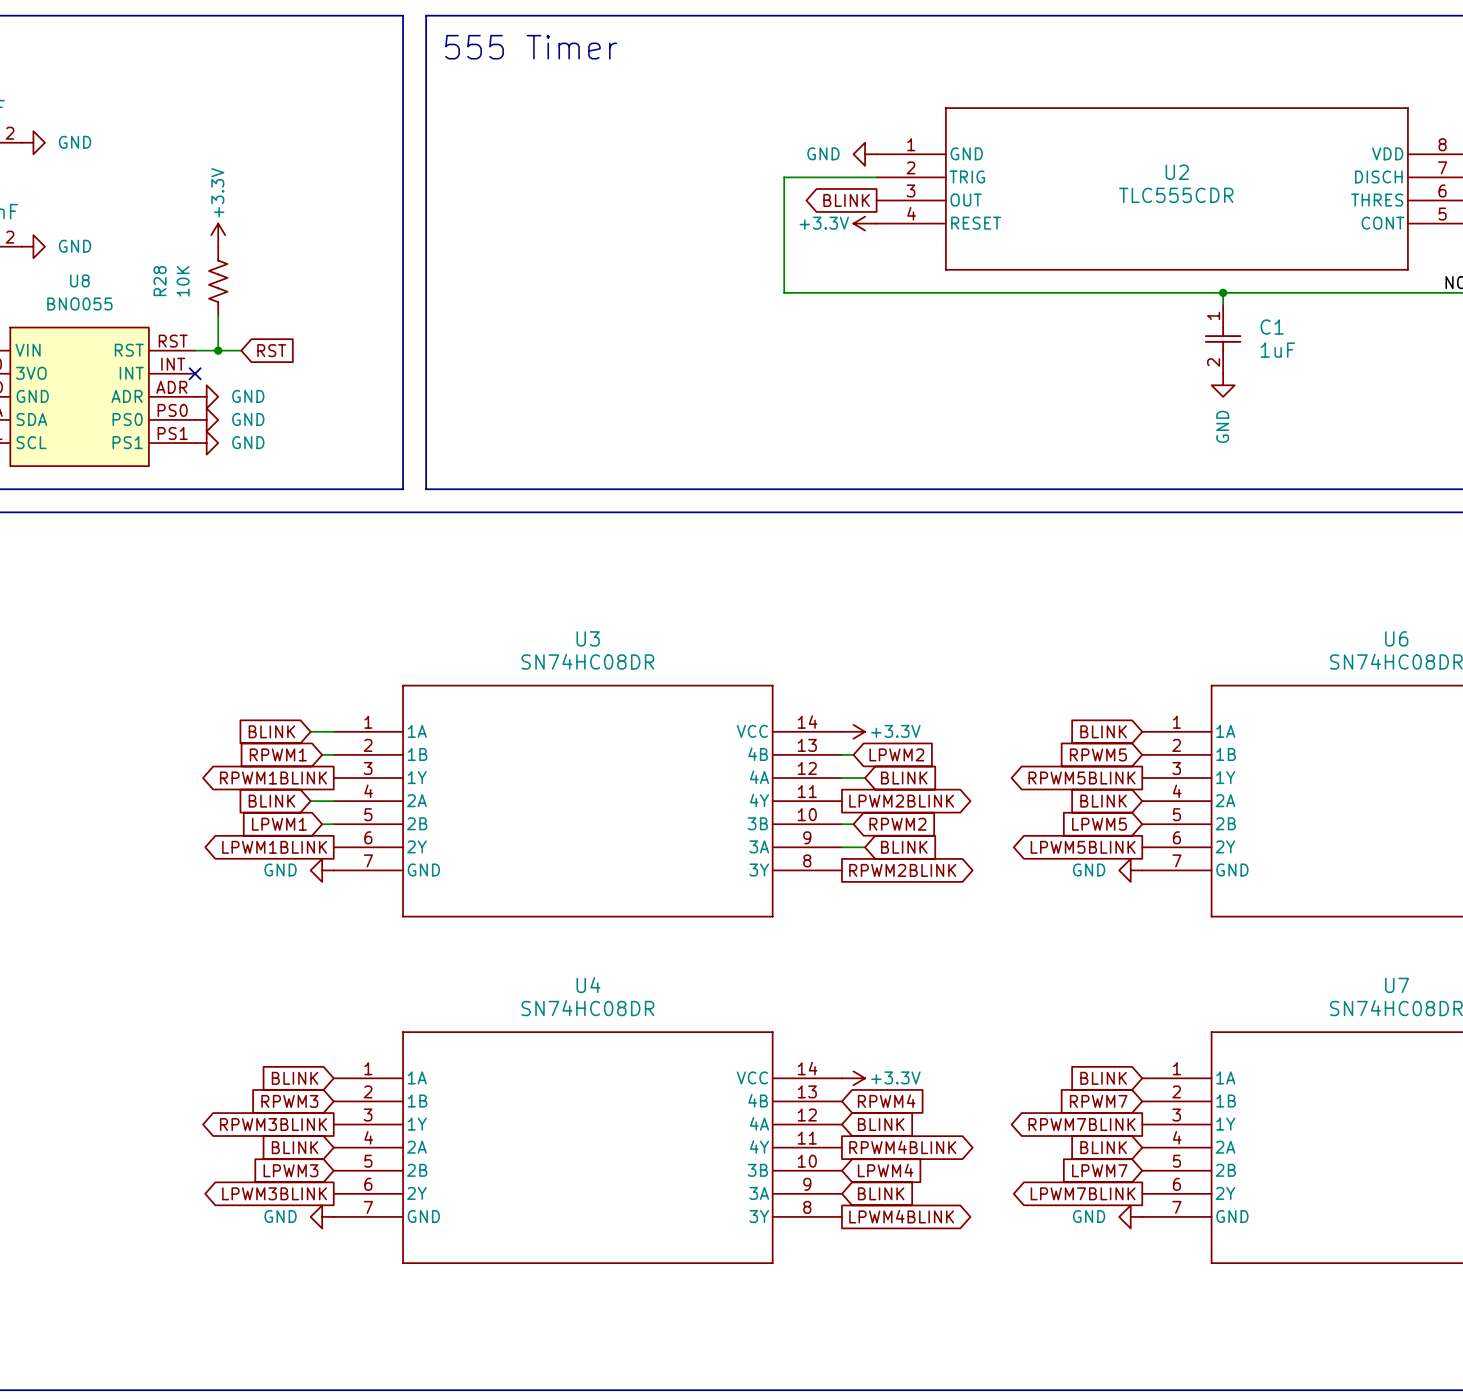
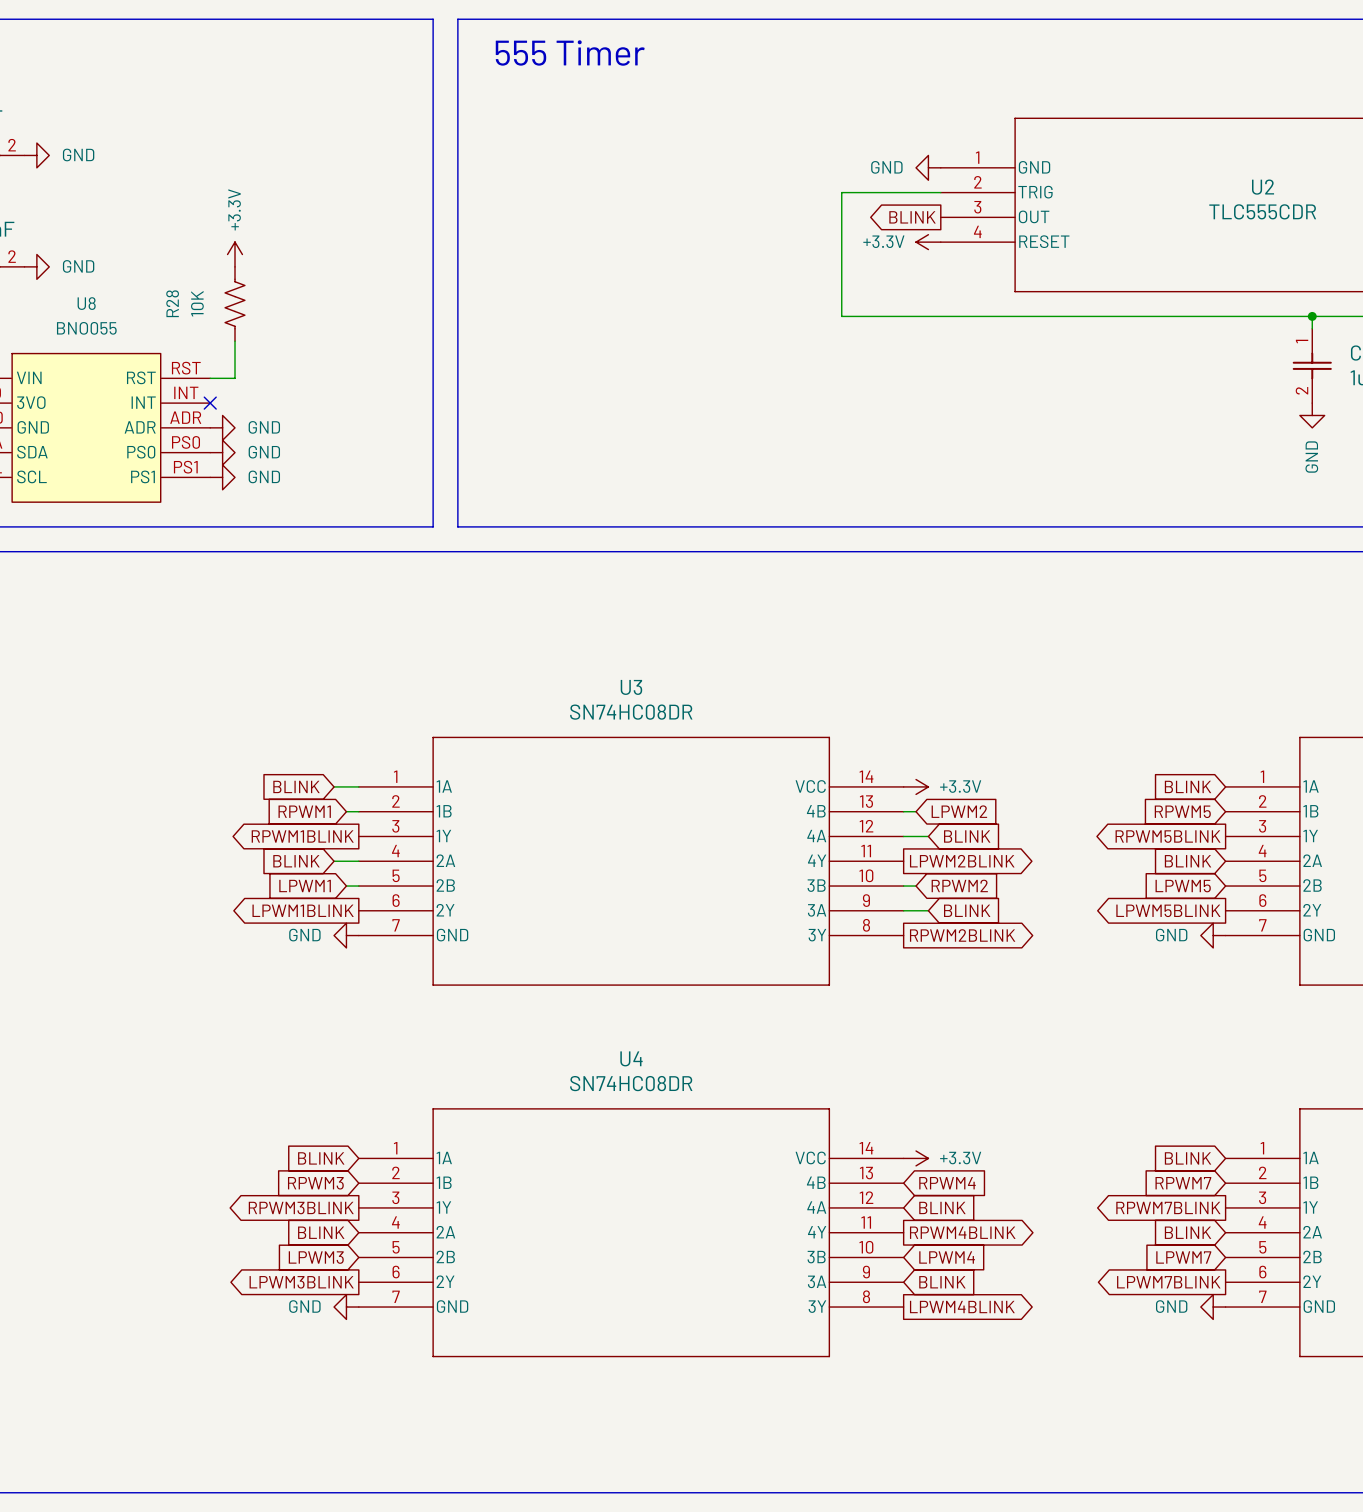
wire: (218, 350) (241, 350) -> none
junction: (218, 350) -> none
global label: RST (271, 350) -> none

